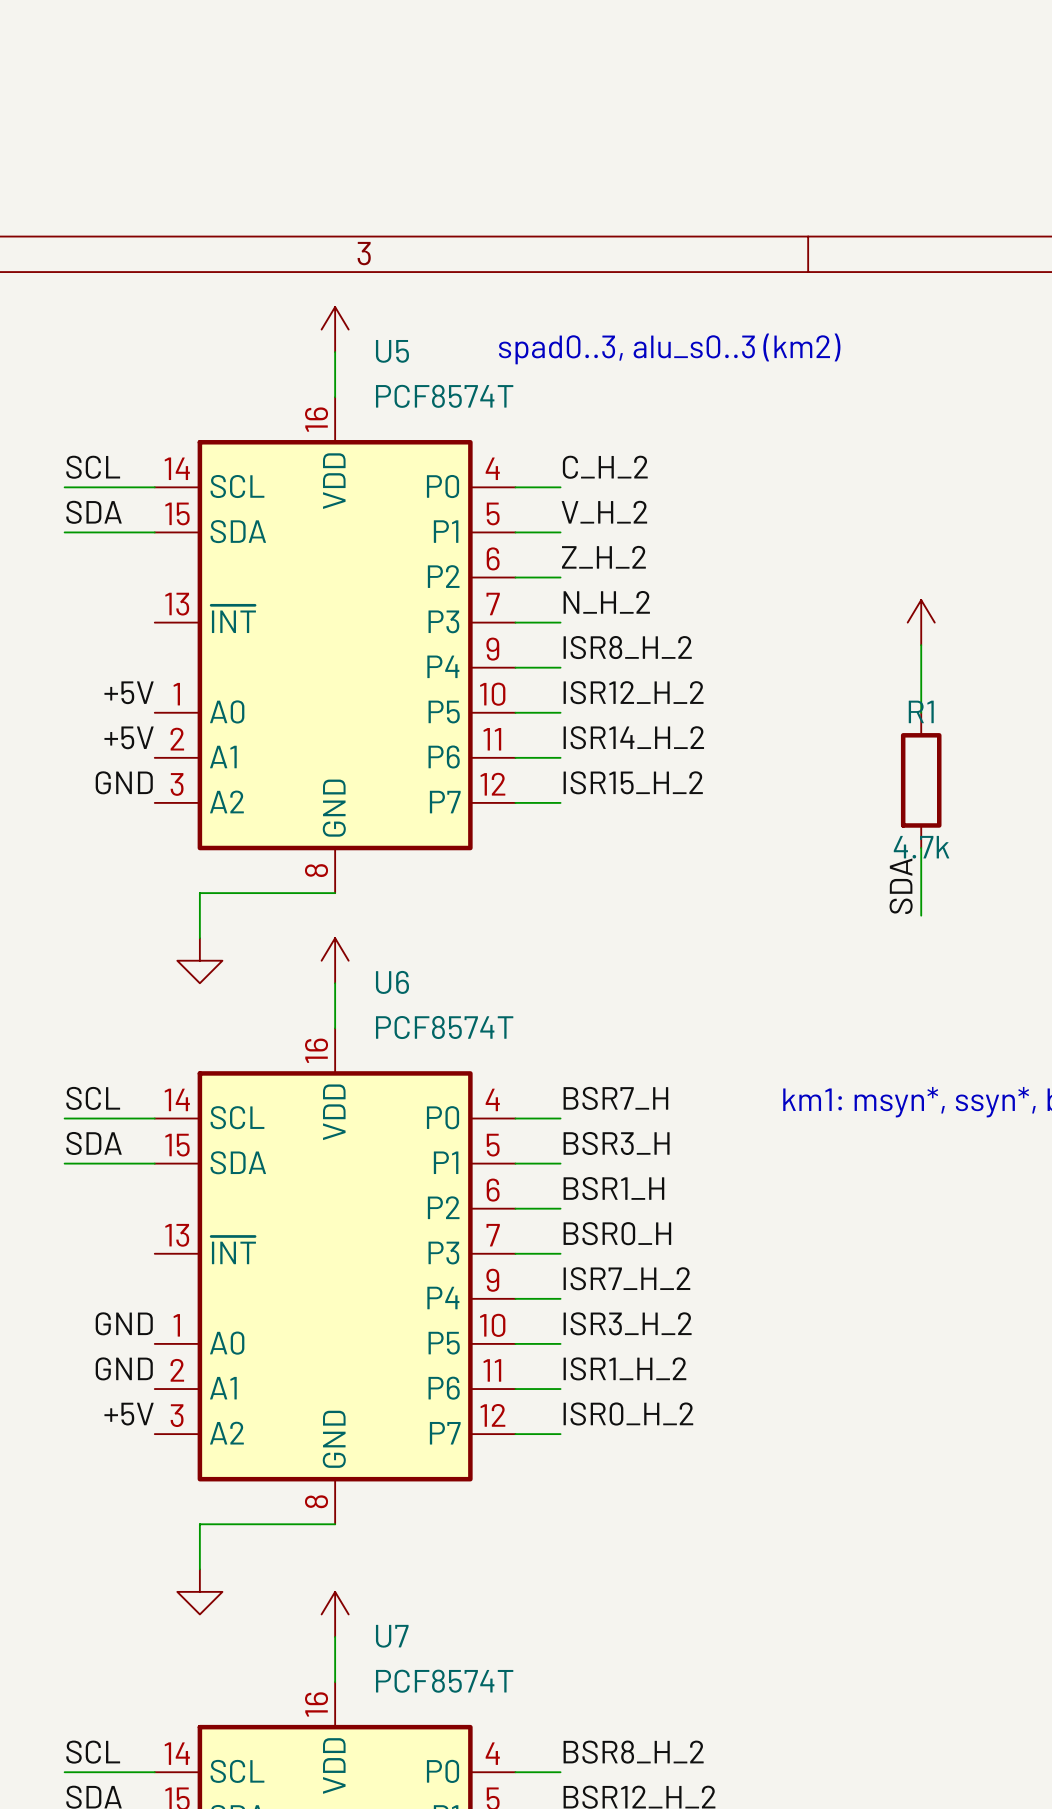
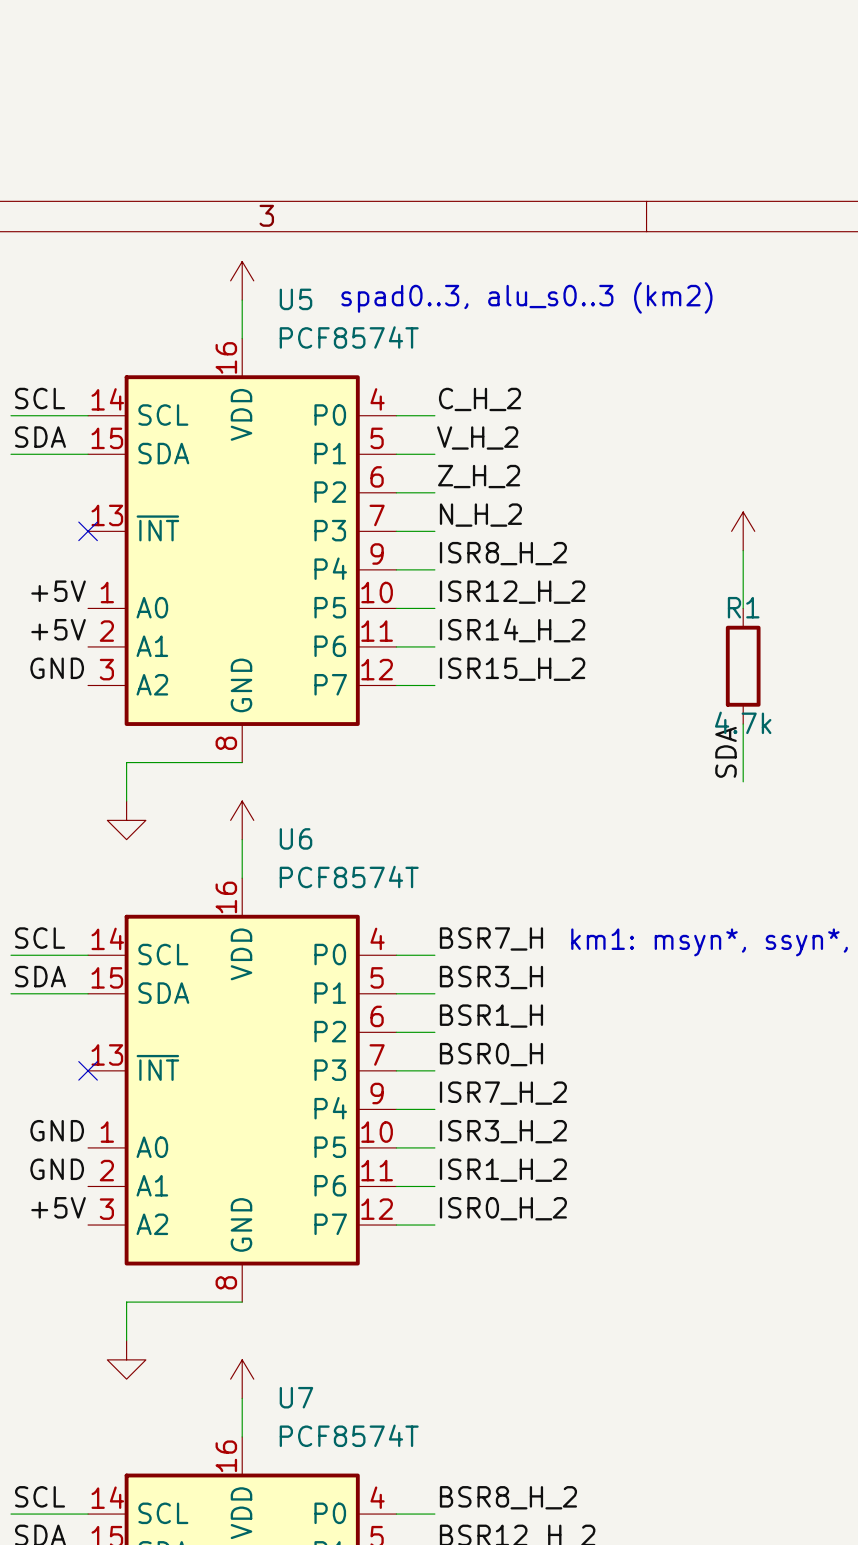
no-connect mark: none -> (88, 531)
no-connect mark: none -> (88, 1070)

